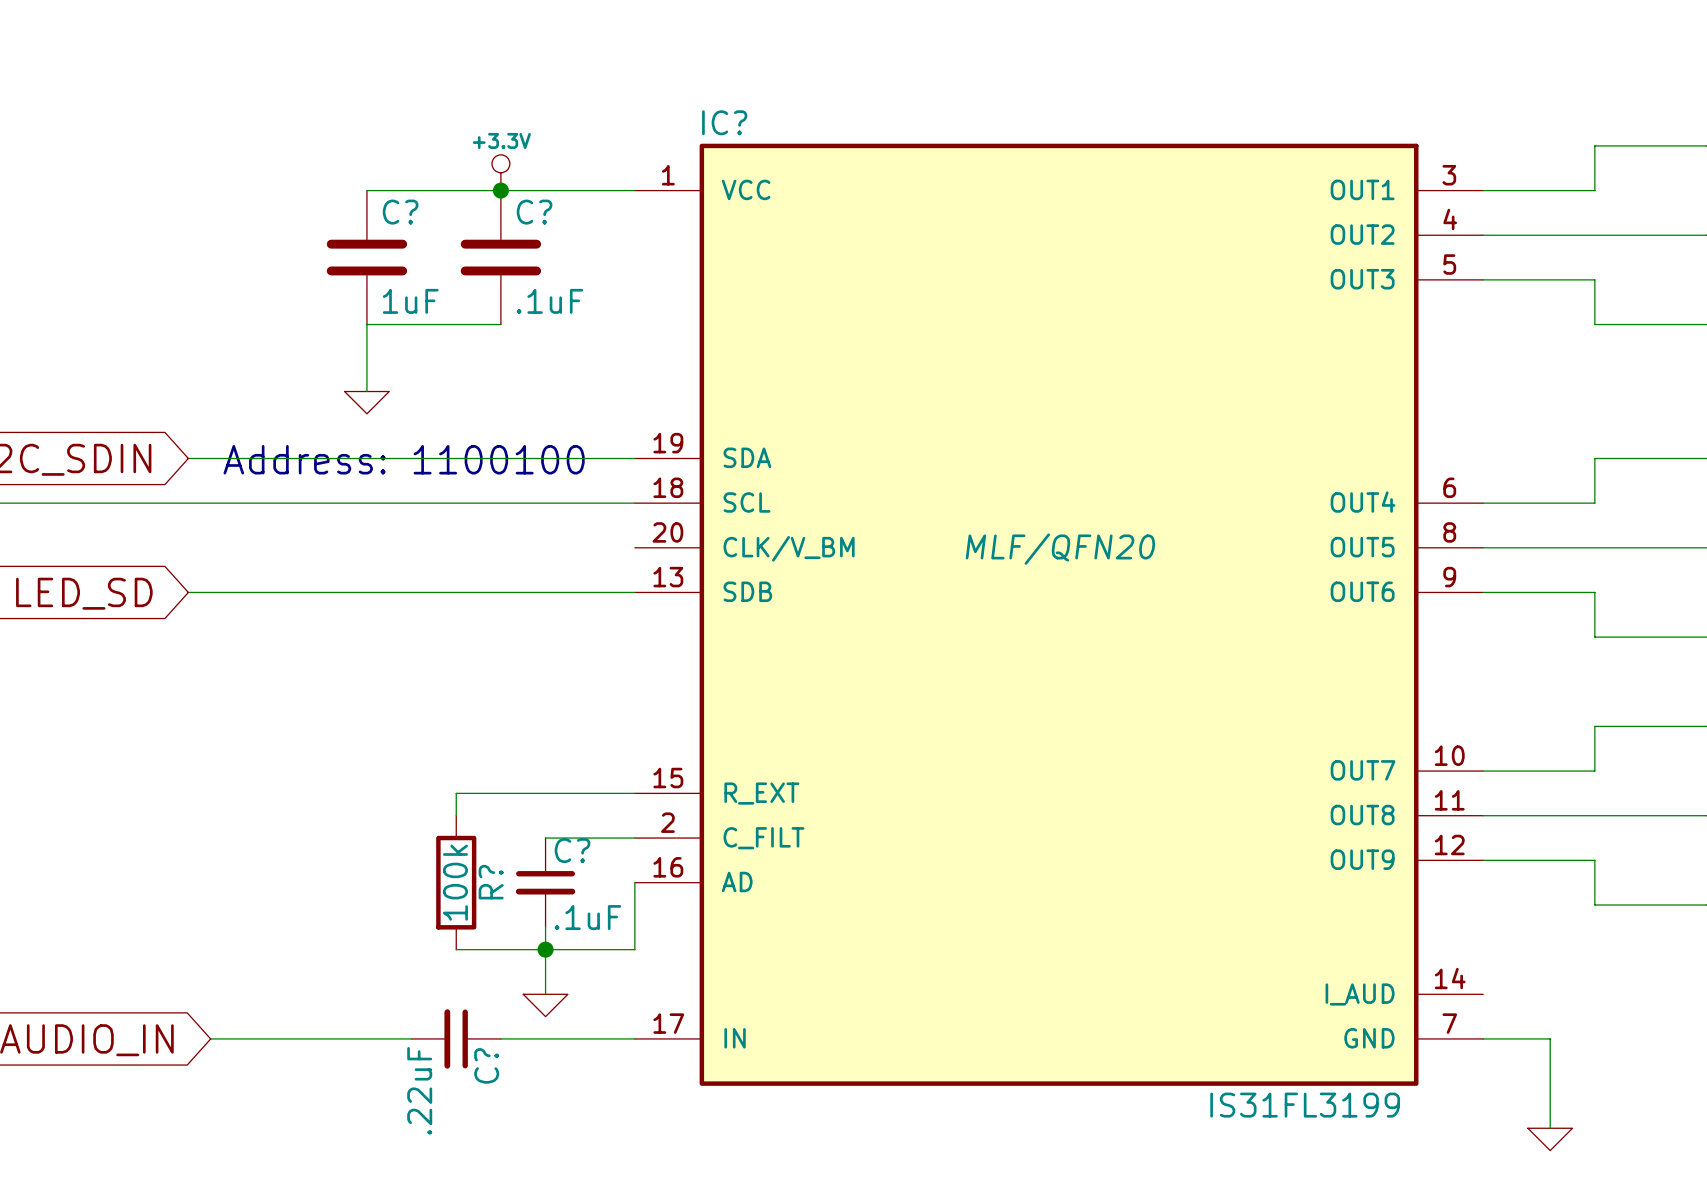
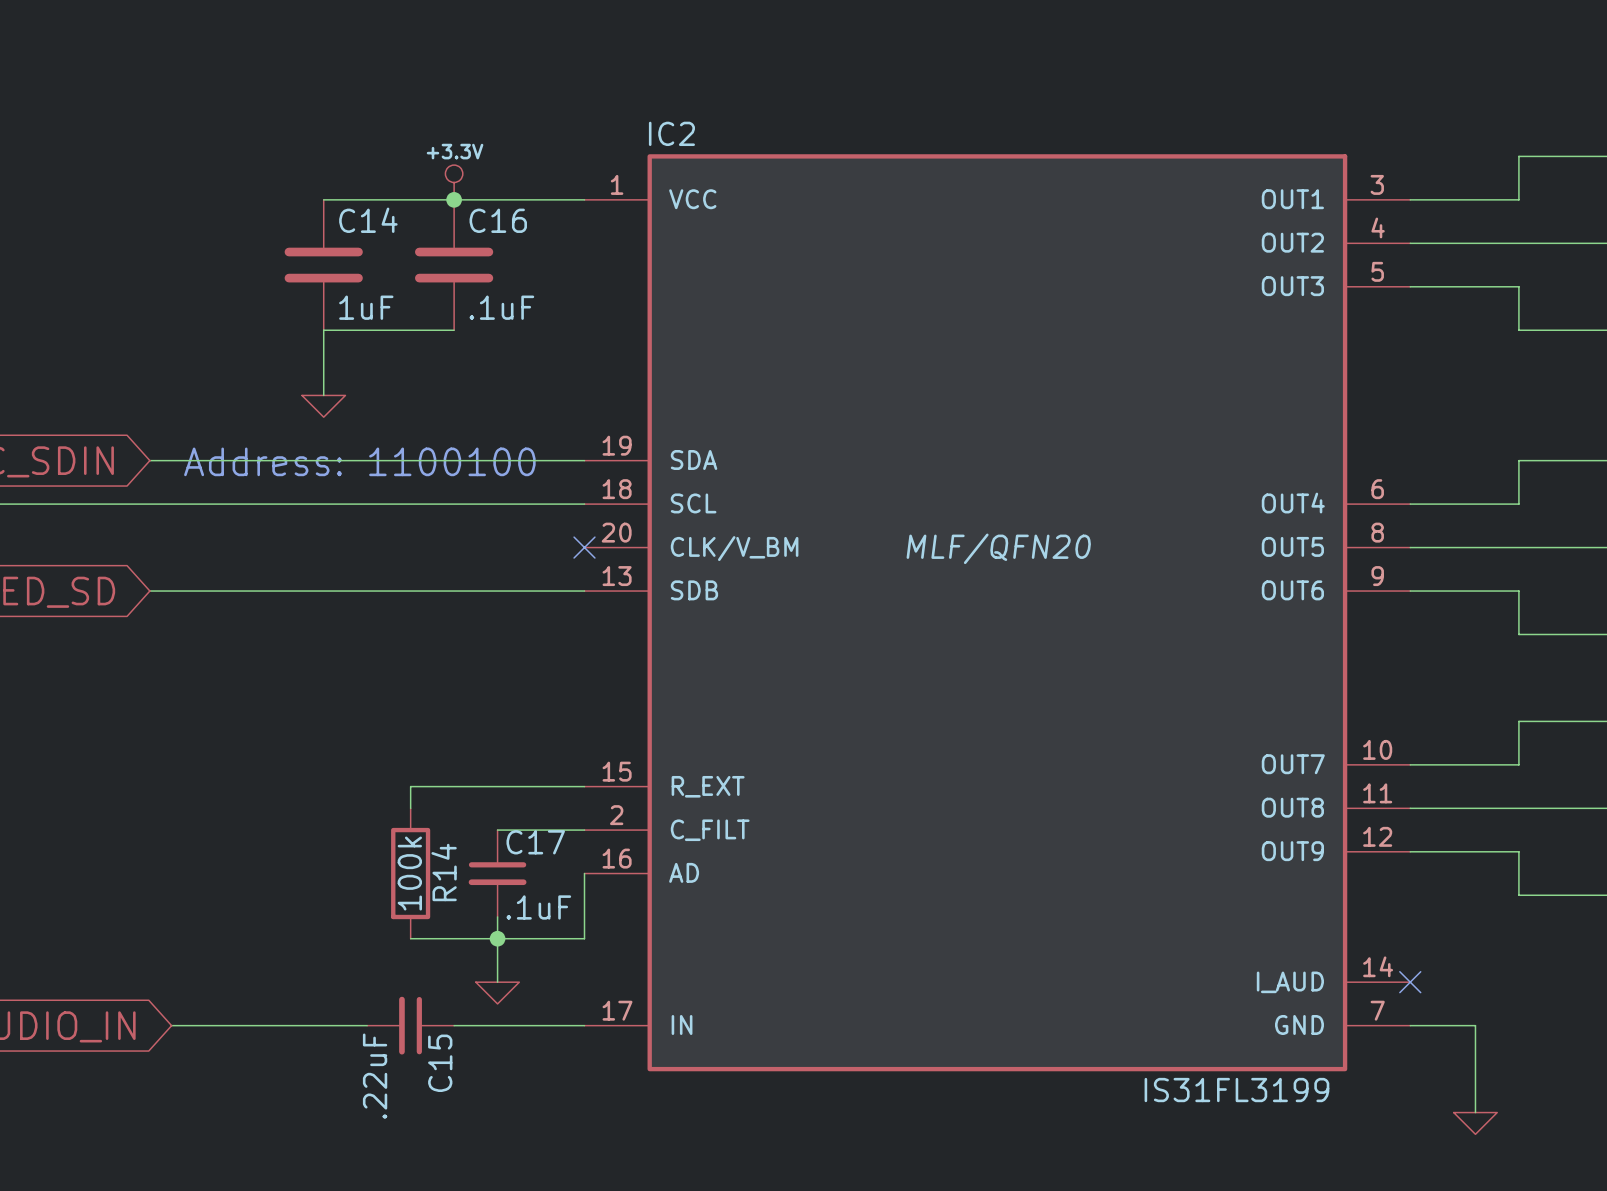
IC? name: IC? (724, 122) -> IC2 (671, 133)
C? name: C? (400, 212) -> C14 (368, 220)
C? name: C? (534, 212) -> C16 (498, 220)
no-connect mark: none -> (584, 547)
C? name: C? (572, 850) -> C17 (535, 842)
R? name: R? (491, 882) -> R14 (444, 872)
no-connect mark: none -> (1410, 982)
C? name: C? (486, 1065) -> C15 (440, 1063)

